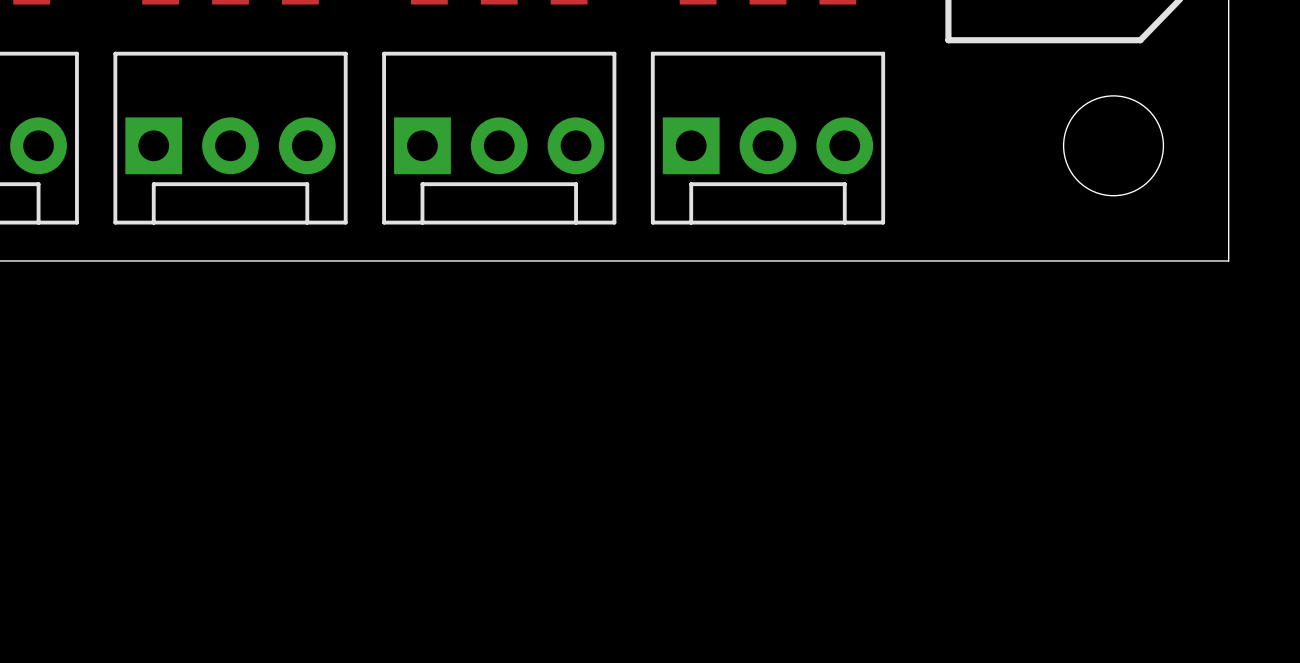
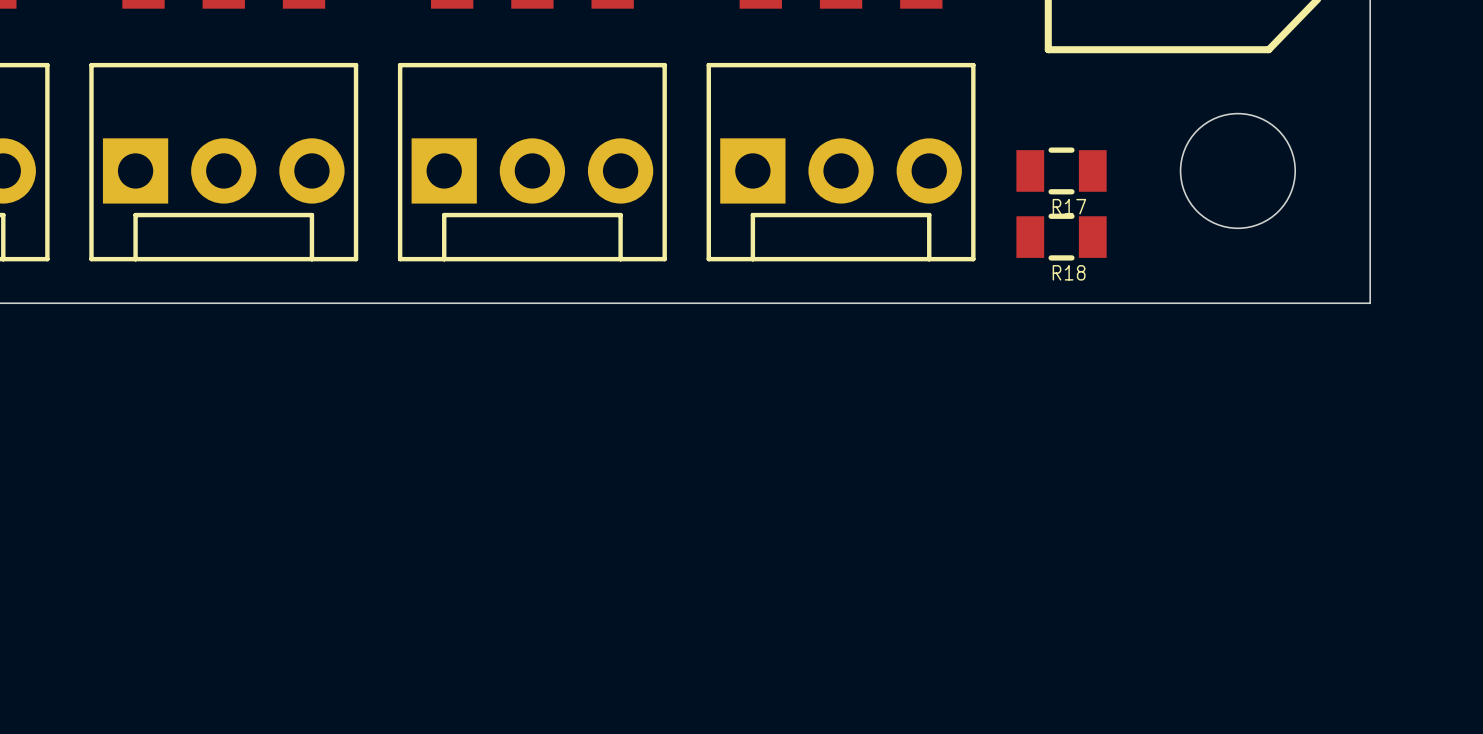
R17: none -> (1061, 170)
R18: none -> (1061, 237)

